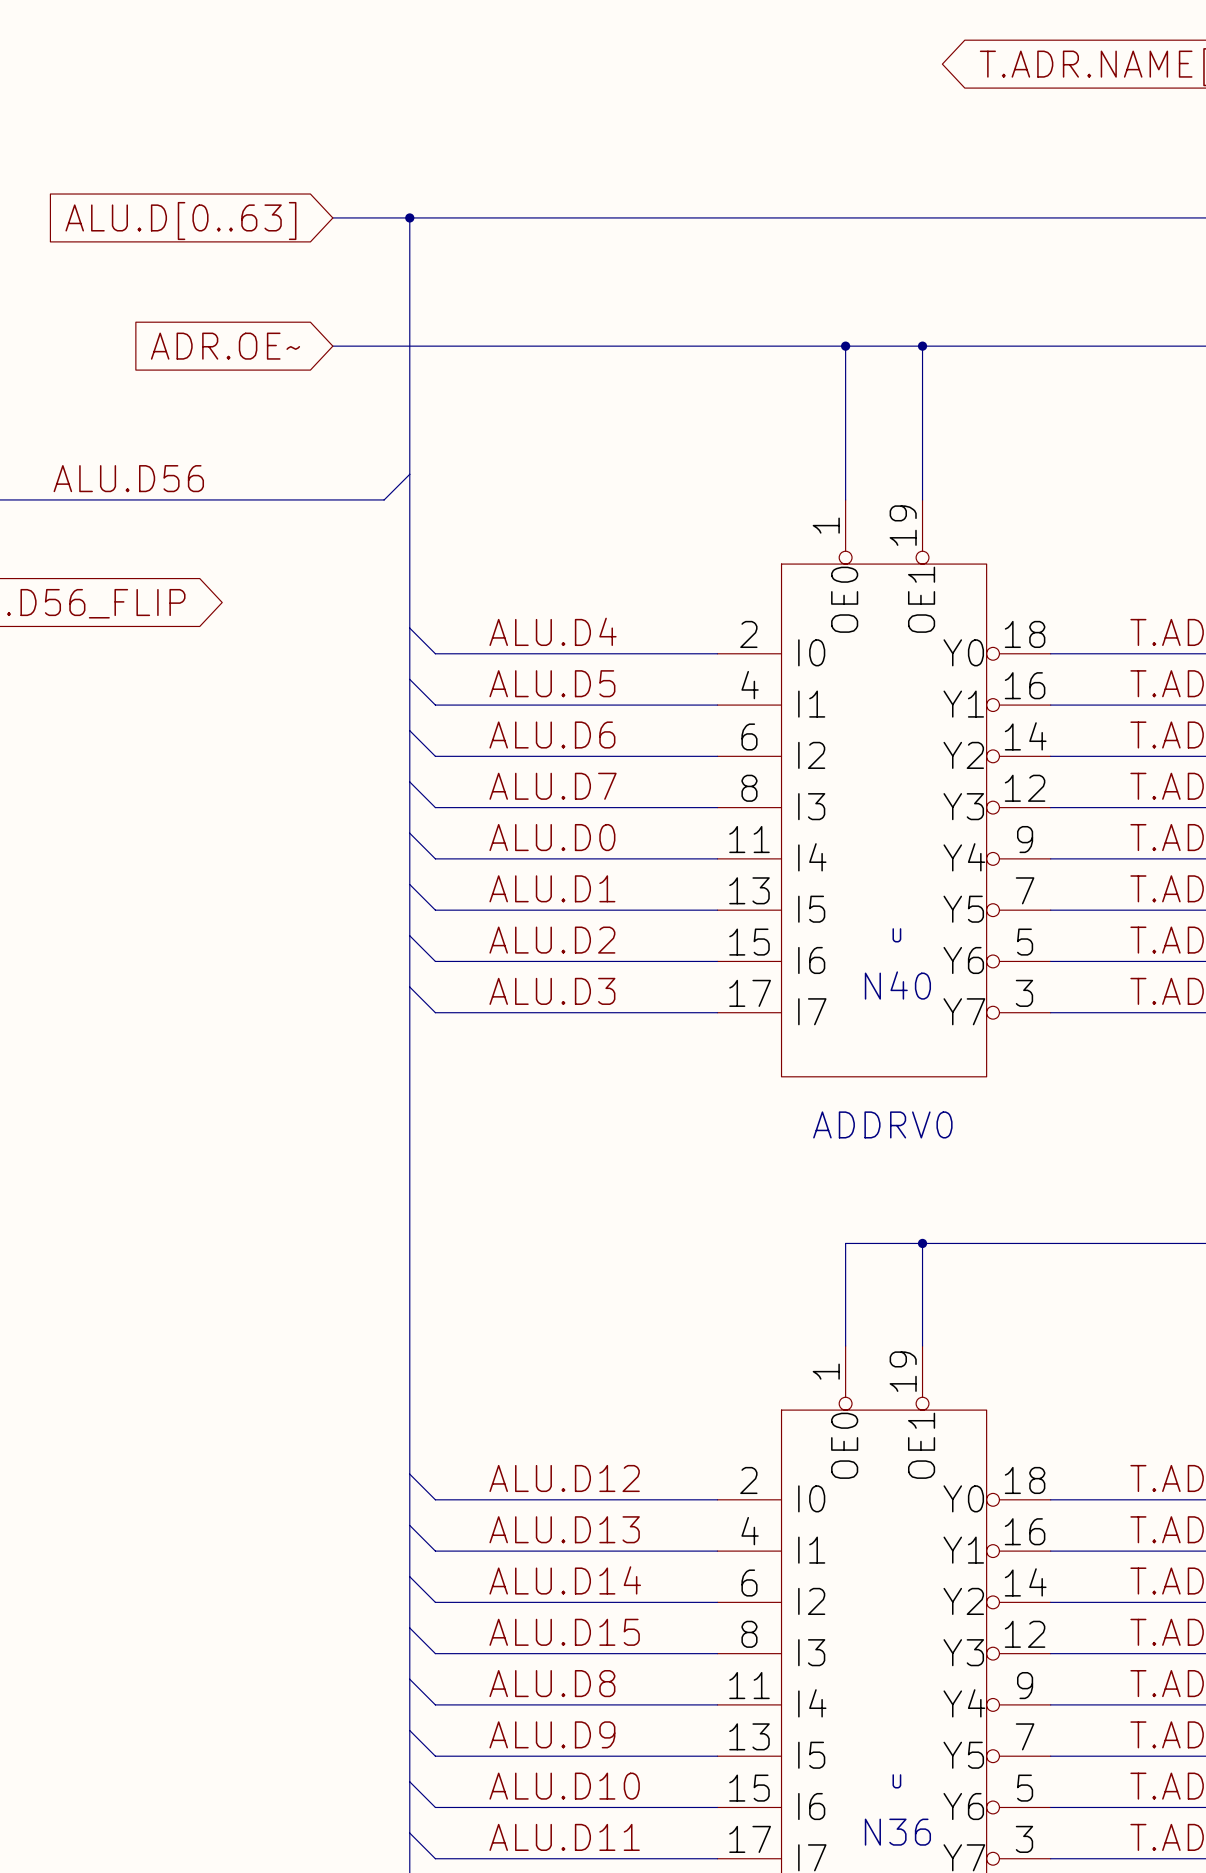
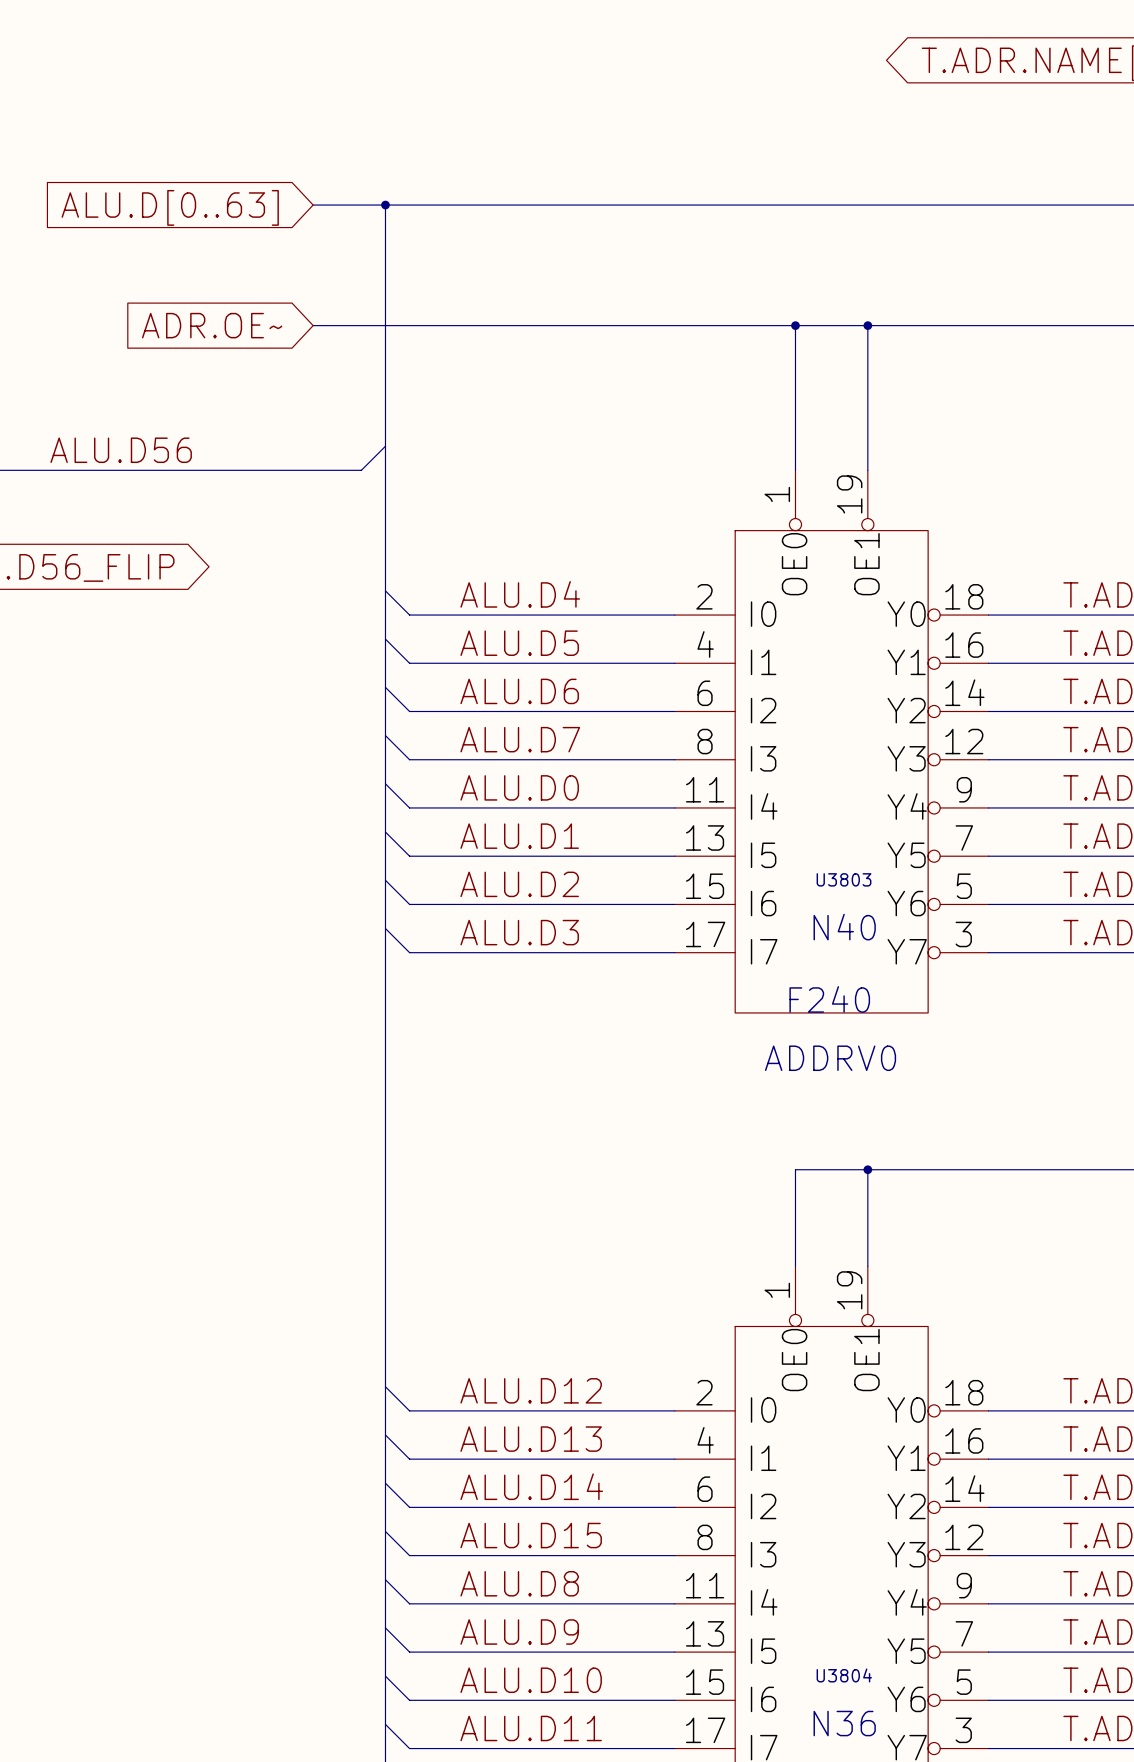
U name: U (896, 935) -> U3803 (844, 879)
U value: none -> F240 (829, 999)
U name: U (896, 1781) -> U3804 (844, 1675)

